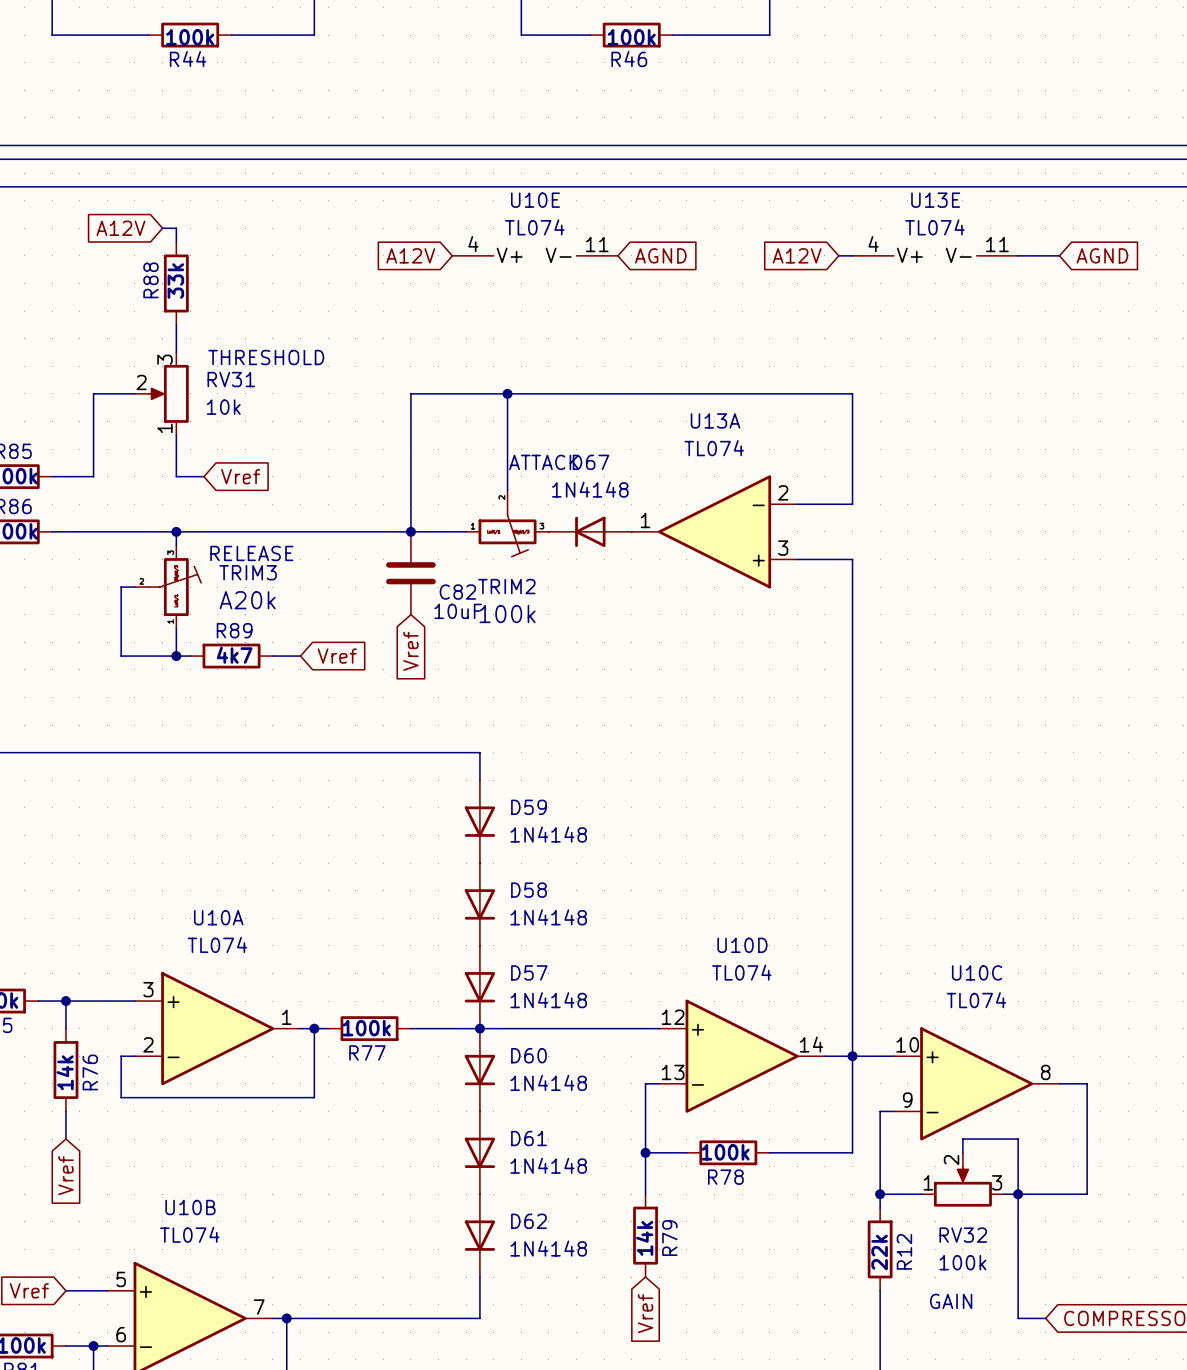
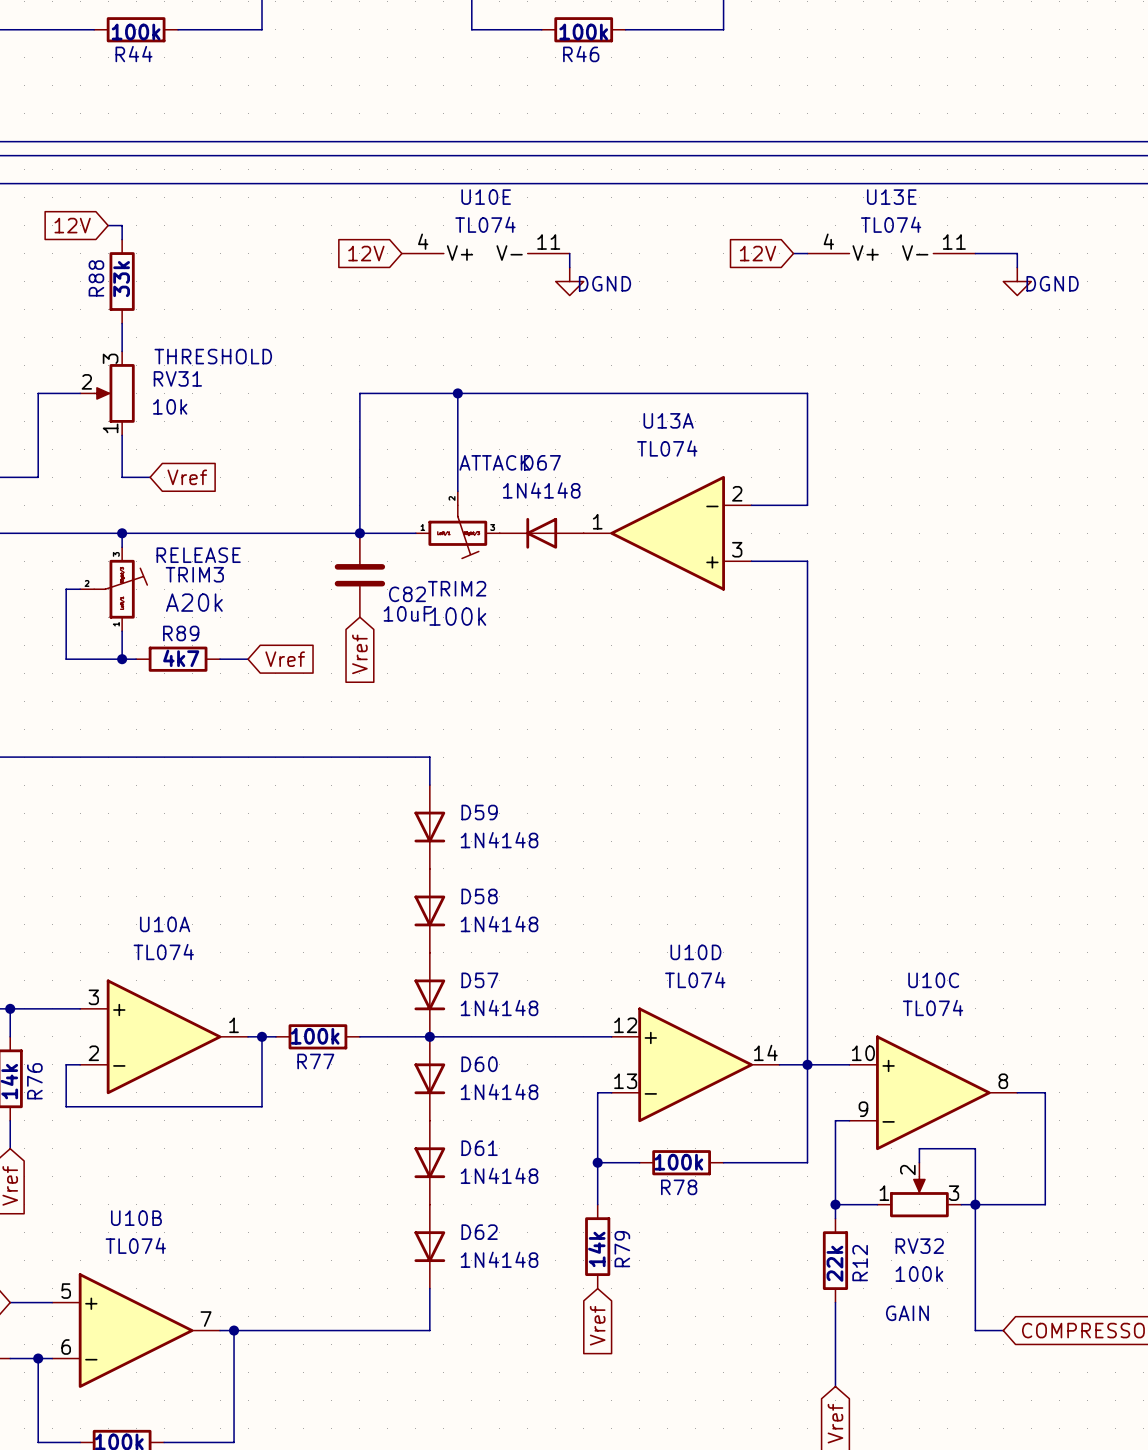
global label: A12V (120, 228) -> 12V (72, 225)
global label: A12V (410, 255) -> 12V (366, 253)
wire: none -> (569, 253) (569, 267)
global label: AGND (660, 255) -> none
global label: A12V (797, 255) -> 12V (758, 253)
wire: none -> (1017, 253) (1017, 267)
global label: AGND (1102, 255) -> none
power symbol: none -> DGND (569, 281)
power symbol: none -> DGND (1017, 281)

